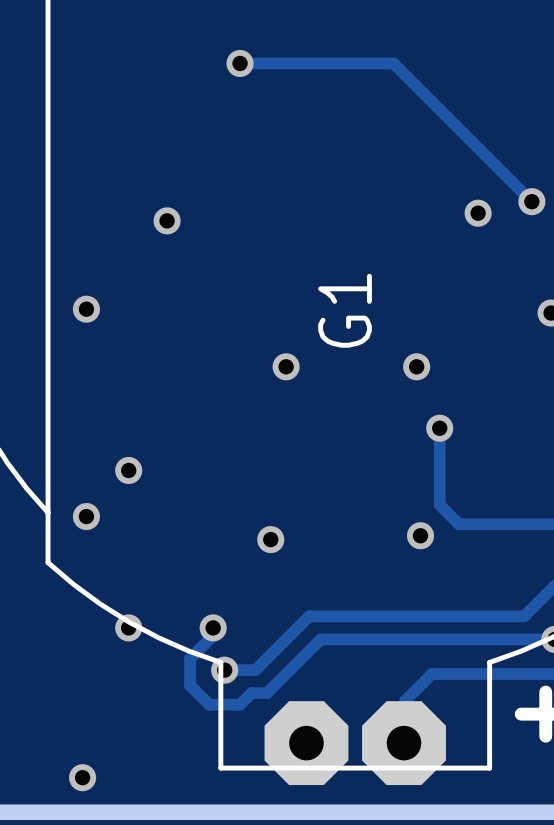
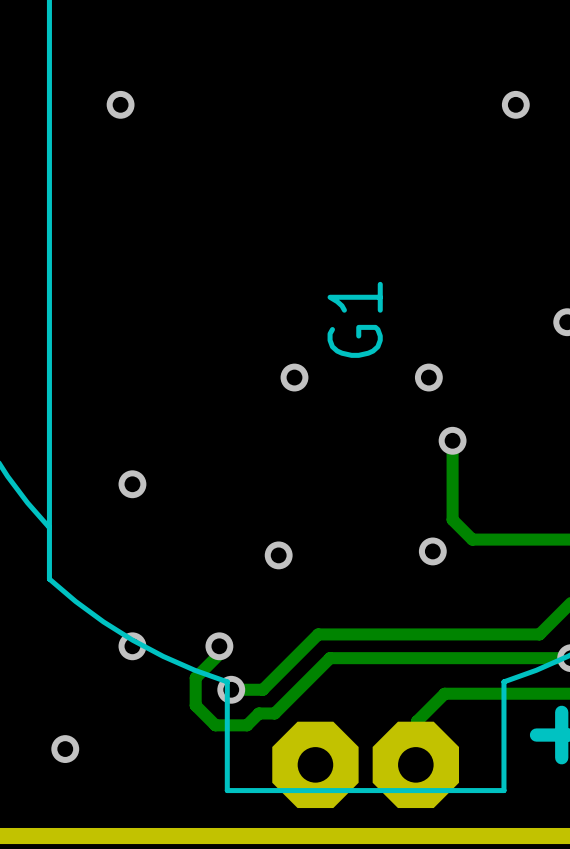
track: (240, 63) (393, 63) (531, 201) -> none
via: (240, 63) -> none
via: none -> (120, 104)
via: none -> (515, 104)
via: (531, 201) -> none
via: (478, 213) -> none
via: (167, 220) -> none
via: (86, 309) -> none
via: (86, 516) -> none
via position: (82, 777) -> (65, 749)

